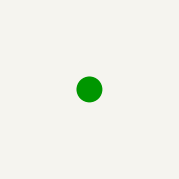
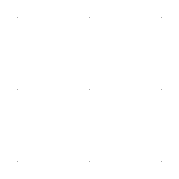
junction: (89, 89) -> none

